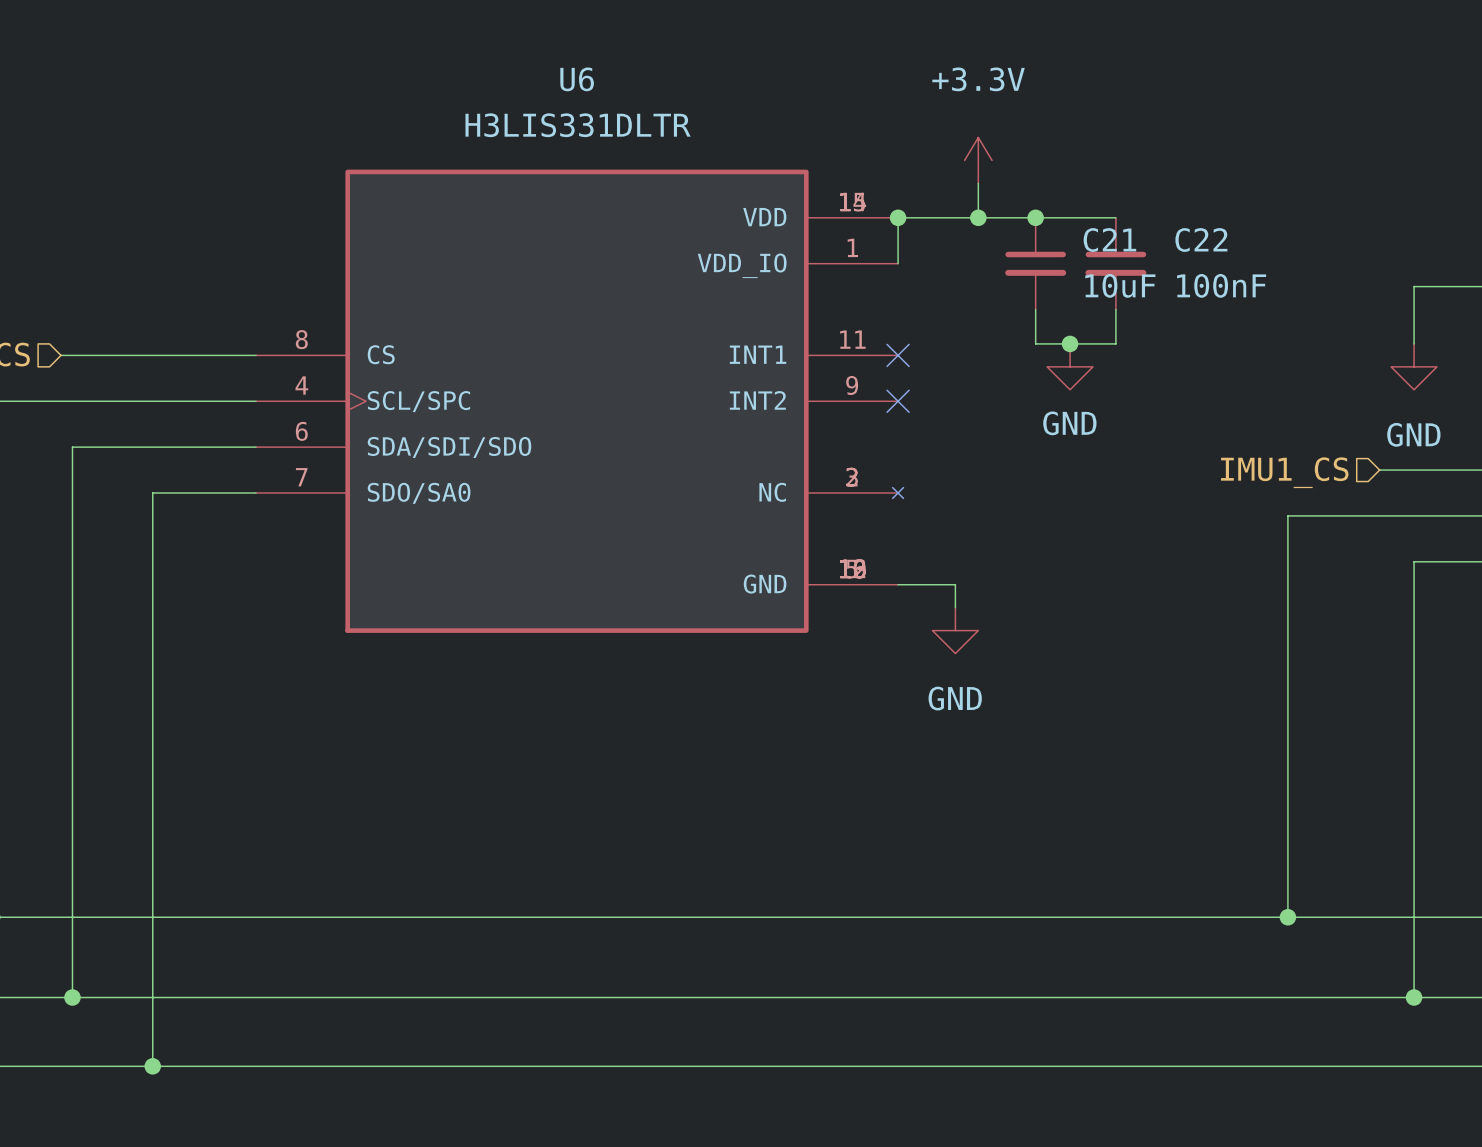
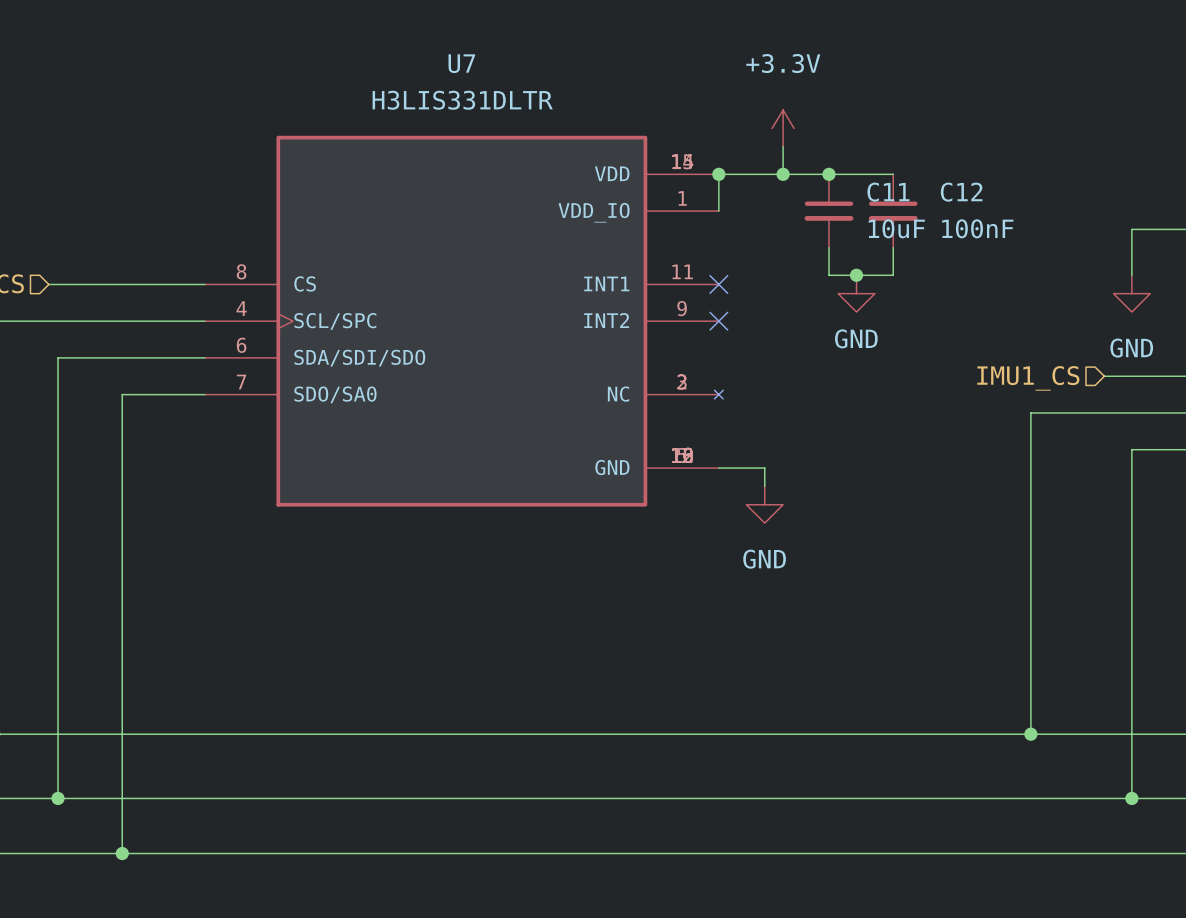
U6 name: U6 (577, 79) -> U7 (461, 63)
C21 name: C21 (1109, 240) -> C11 (888, 192)
C22 name: C22 (1201, 240) -> C12 (961, 192)

